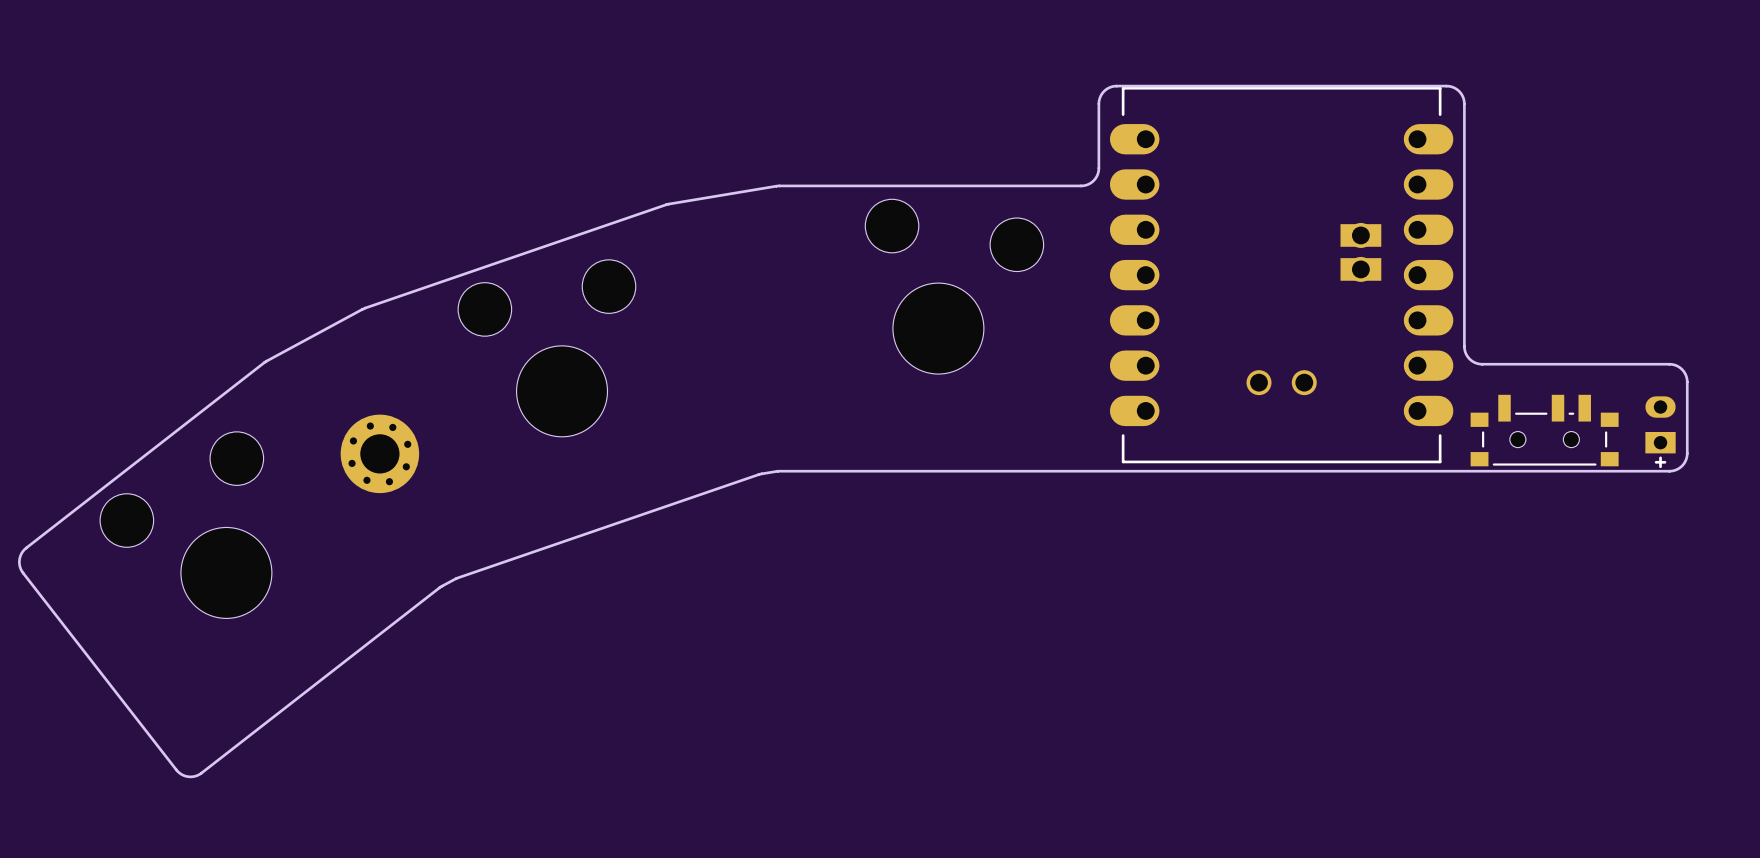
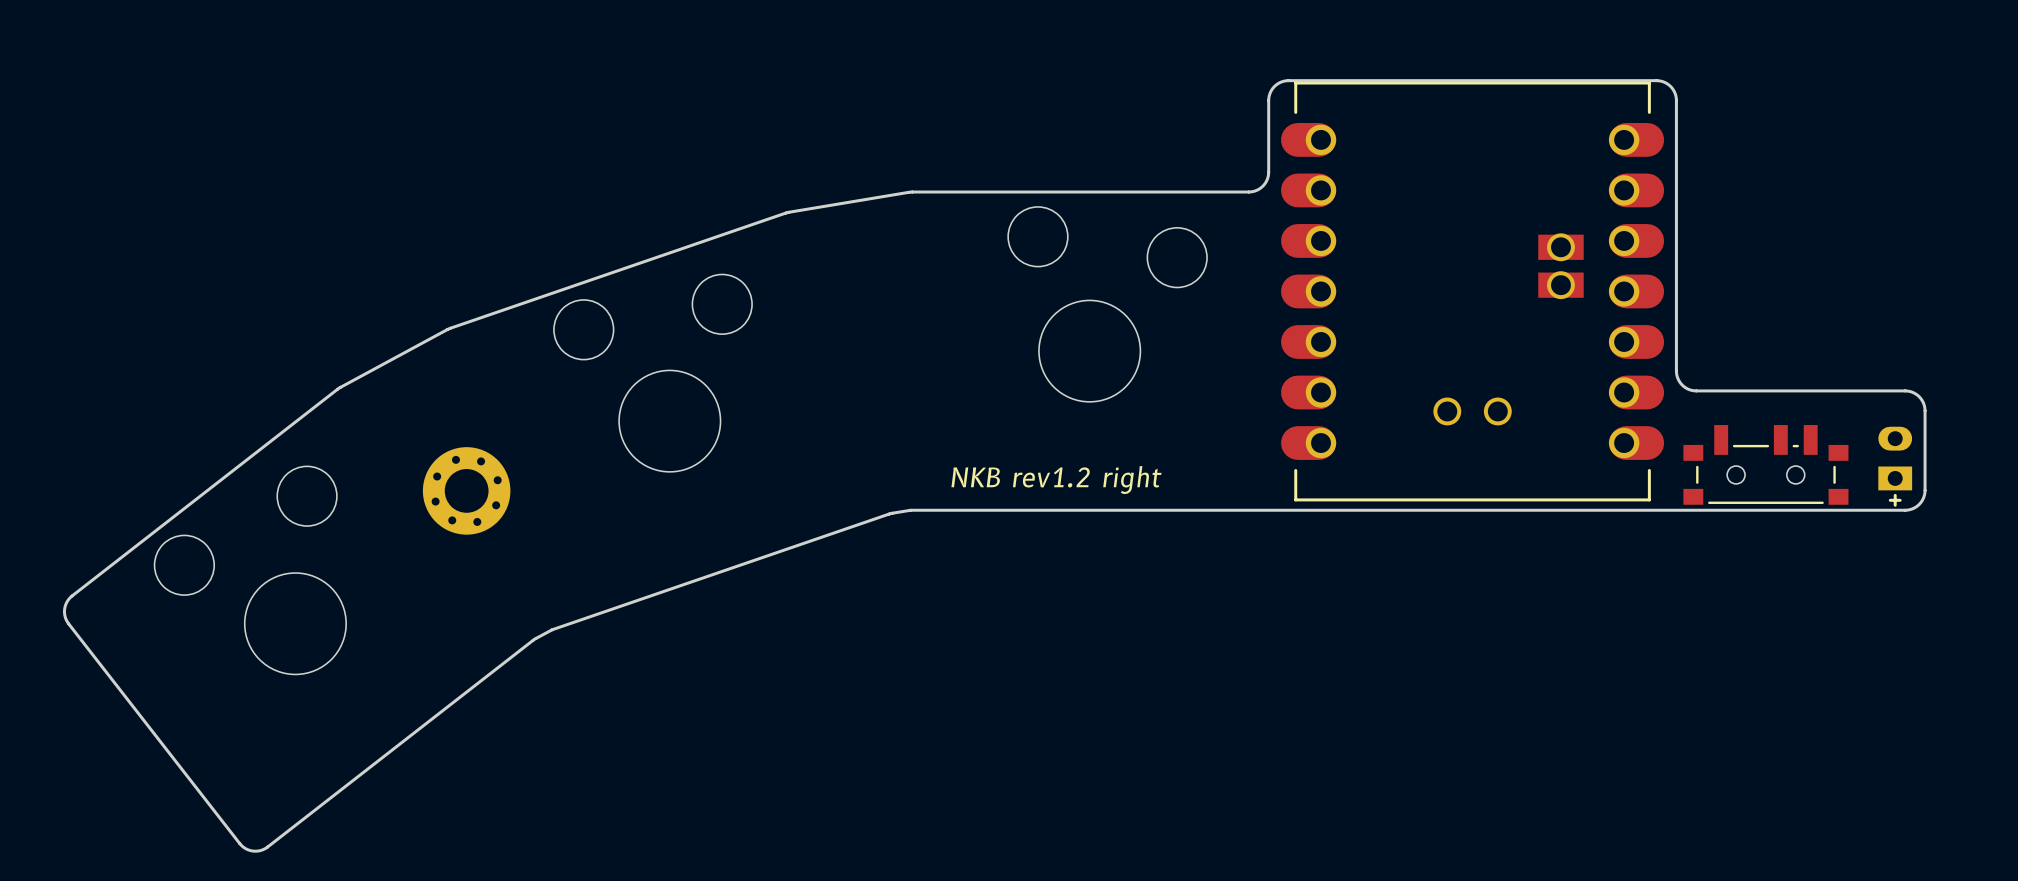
text: none -> NKB rev1.2 right (1056, 480)

